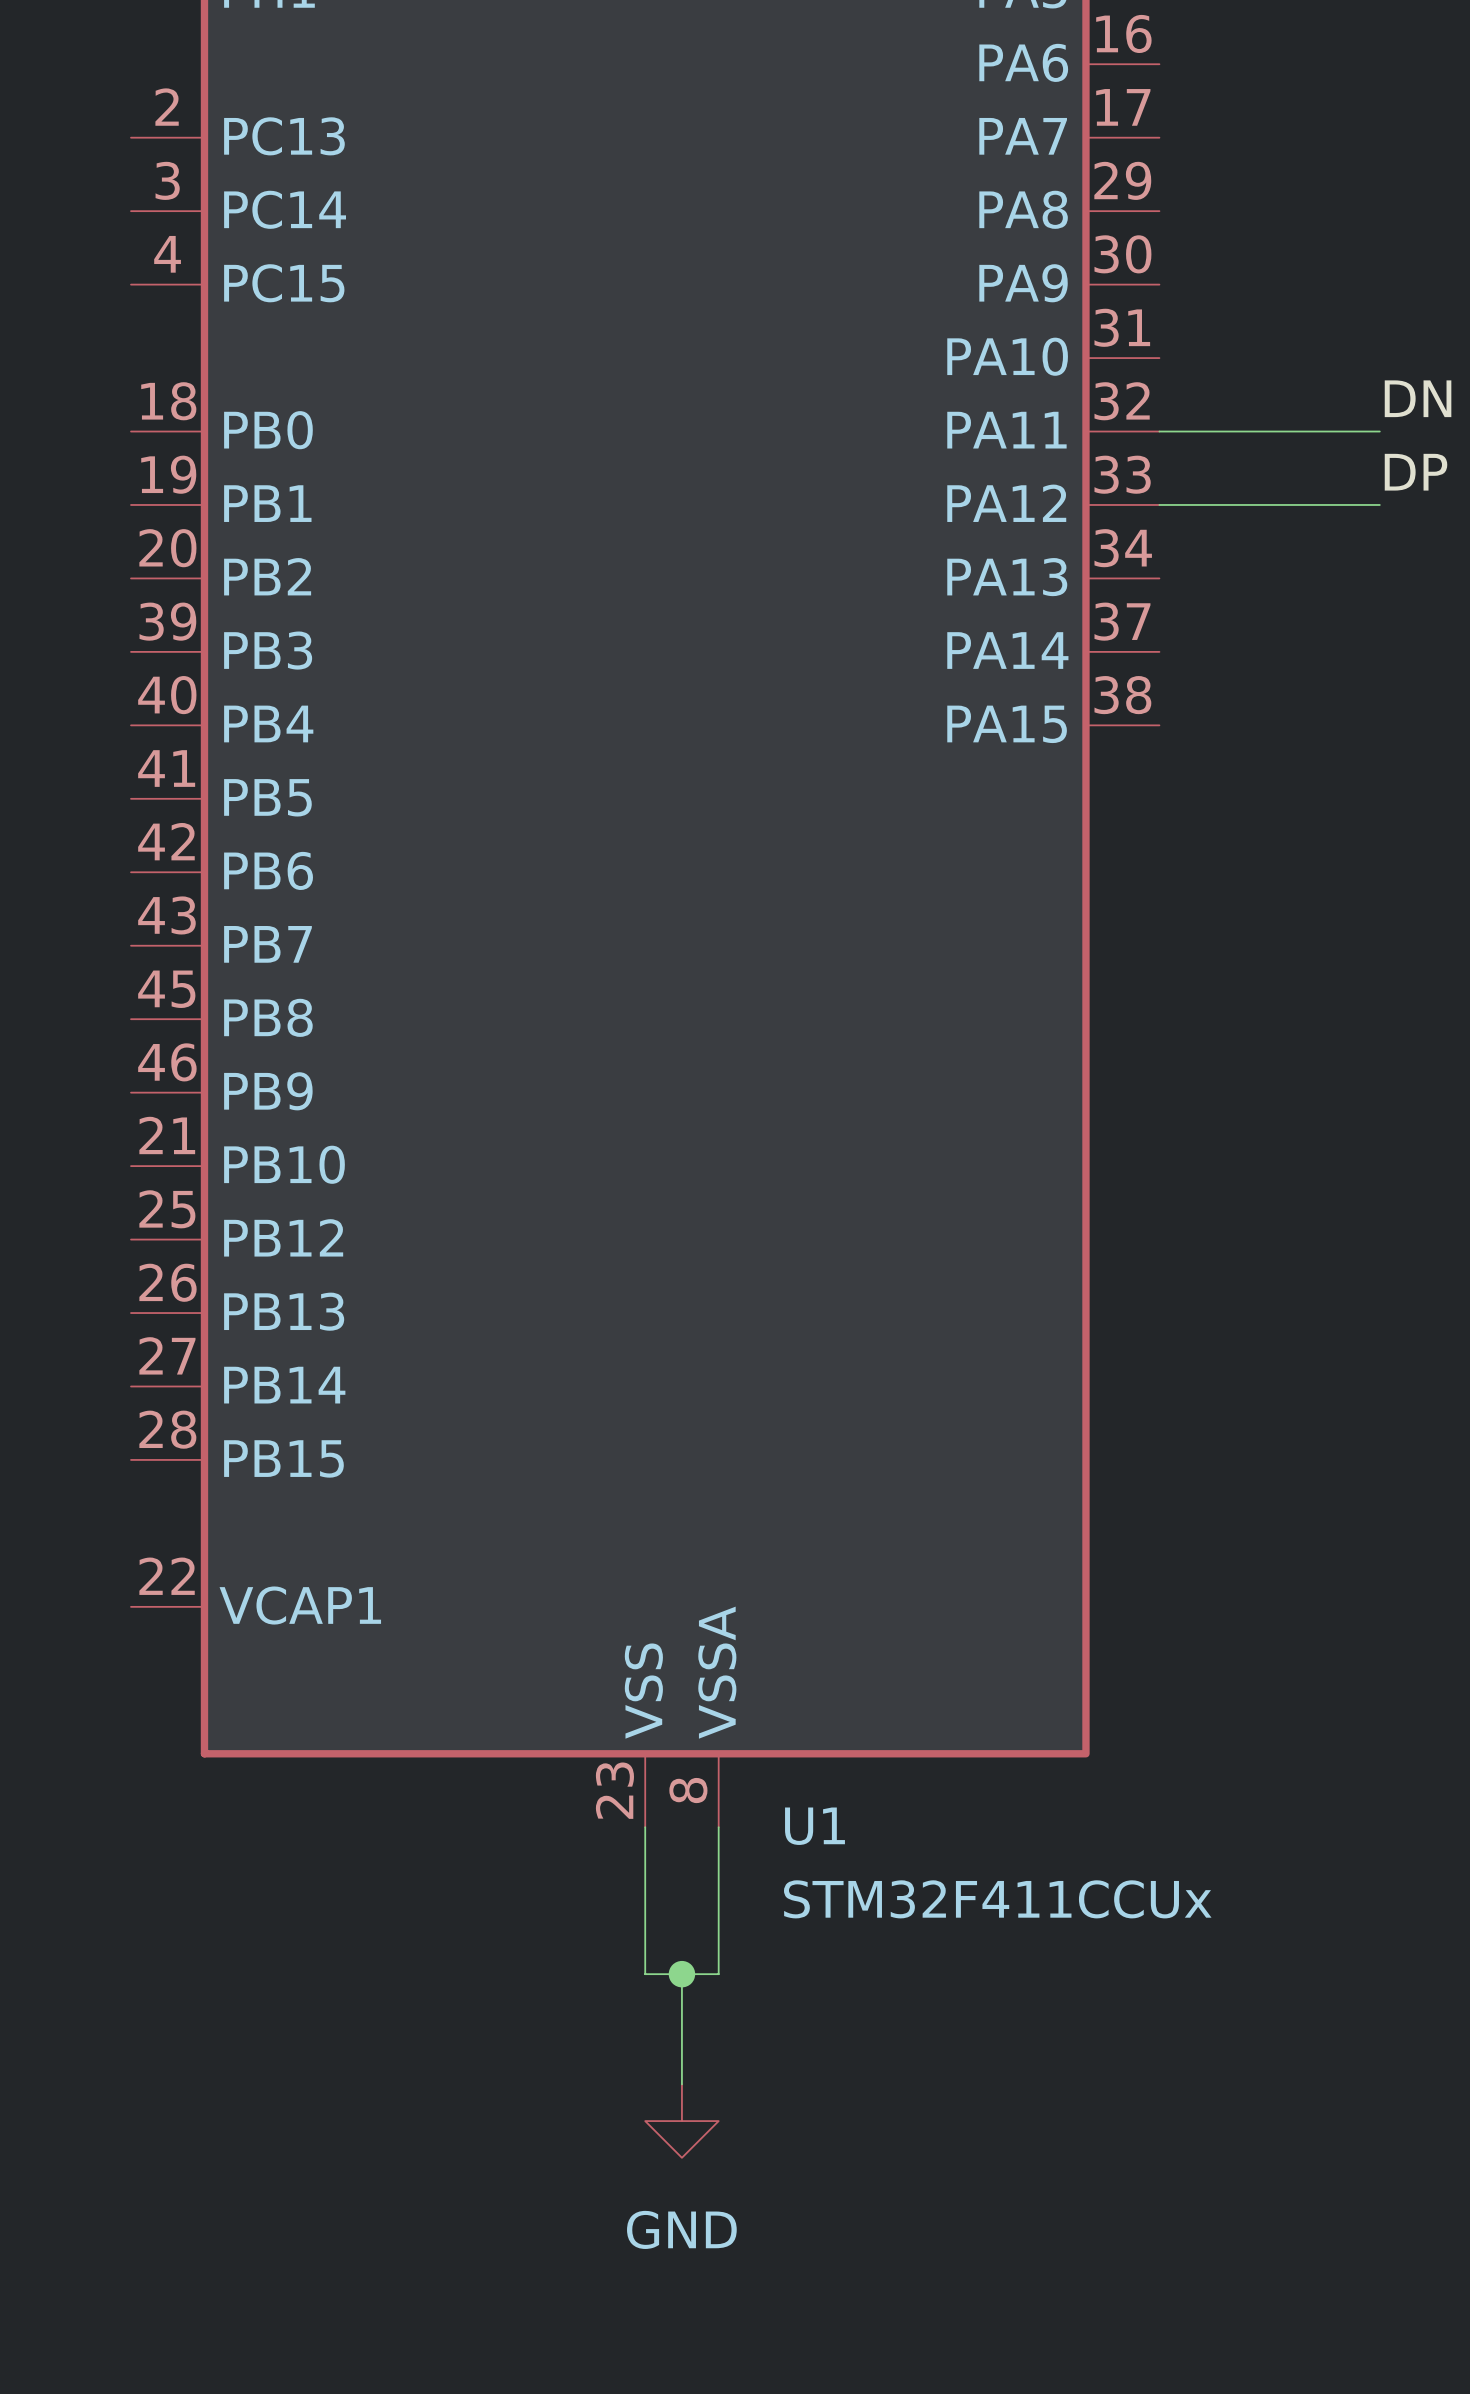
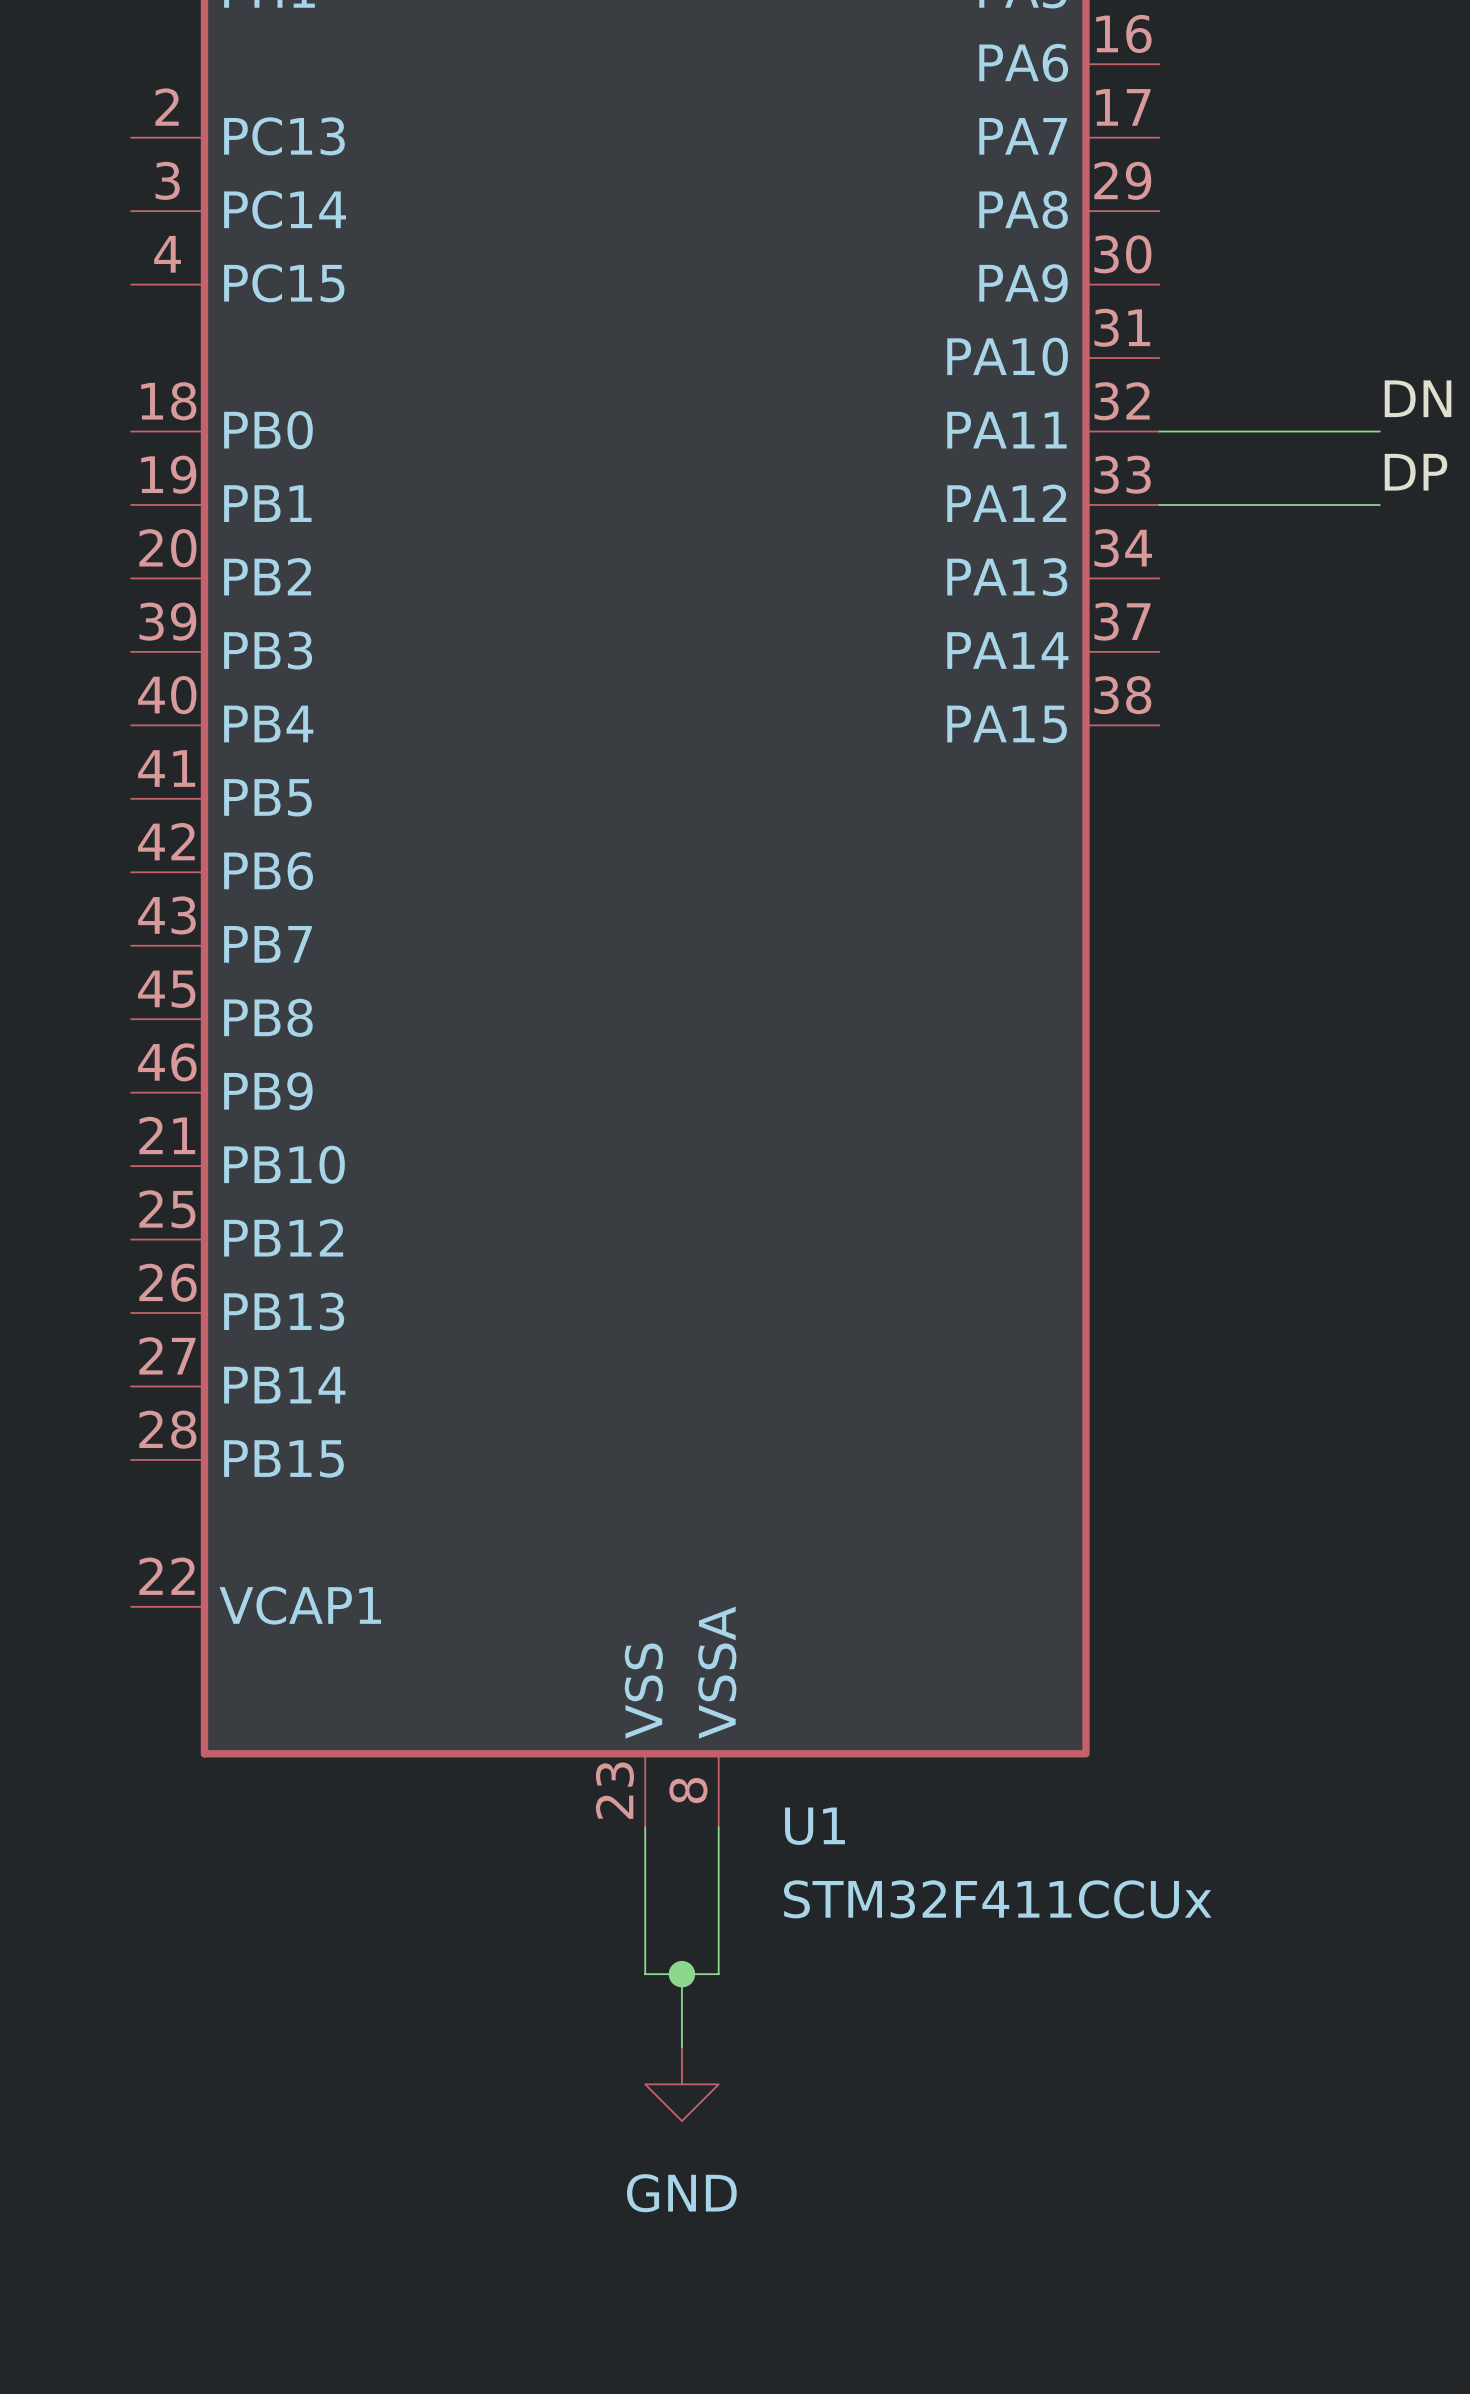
power symbol position: GND (681, 2121) -> GND (681, 2084)

